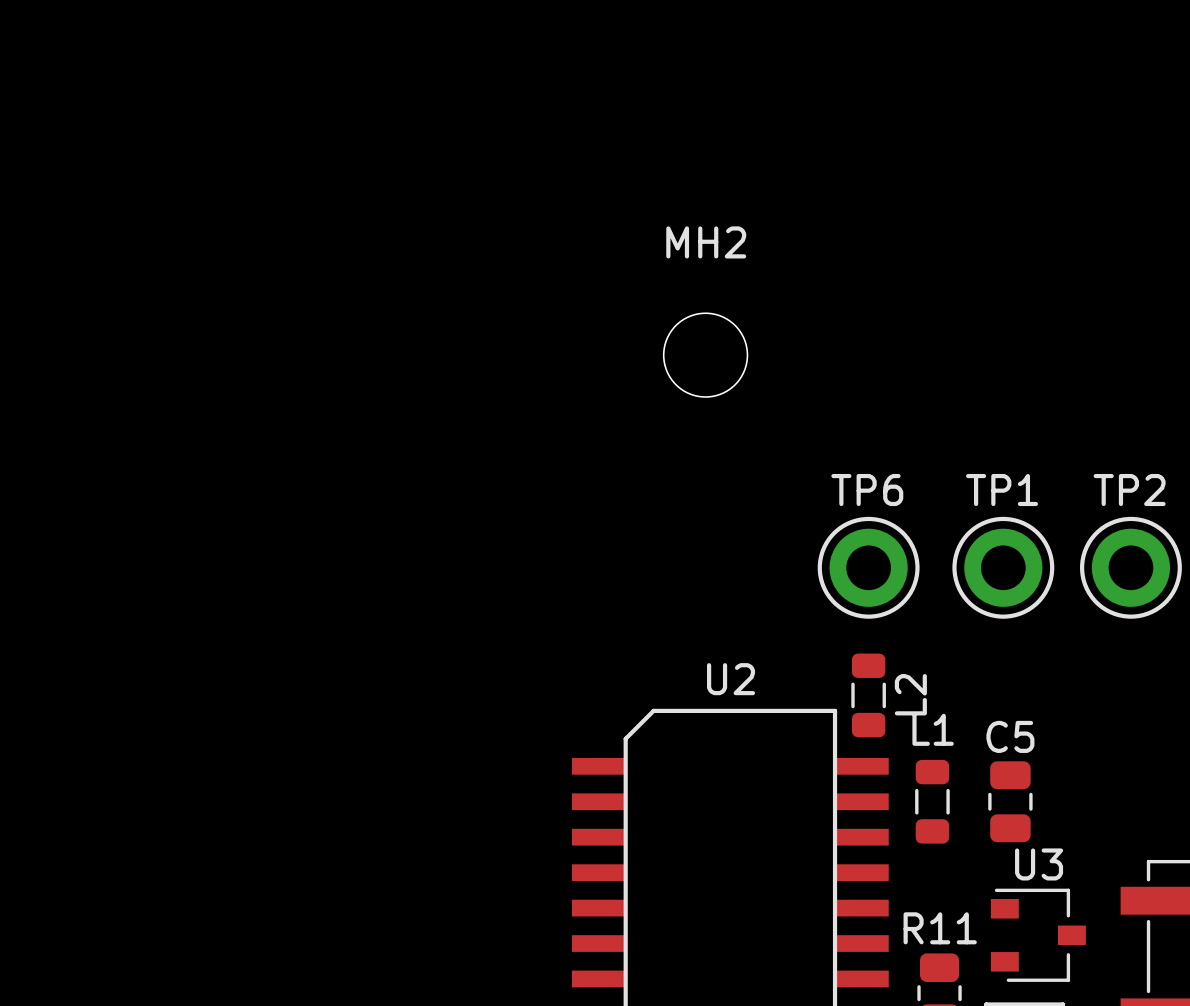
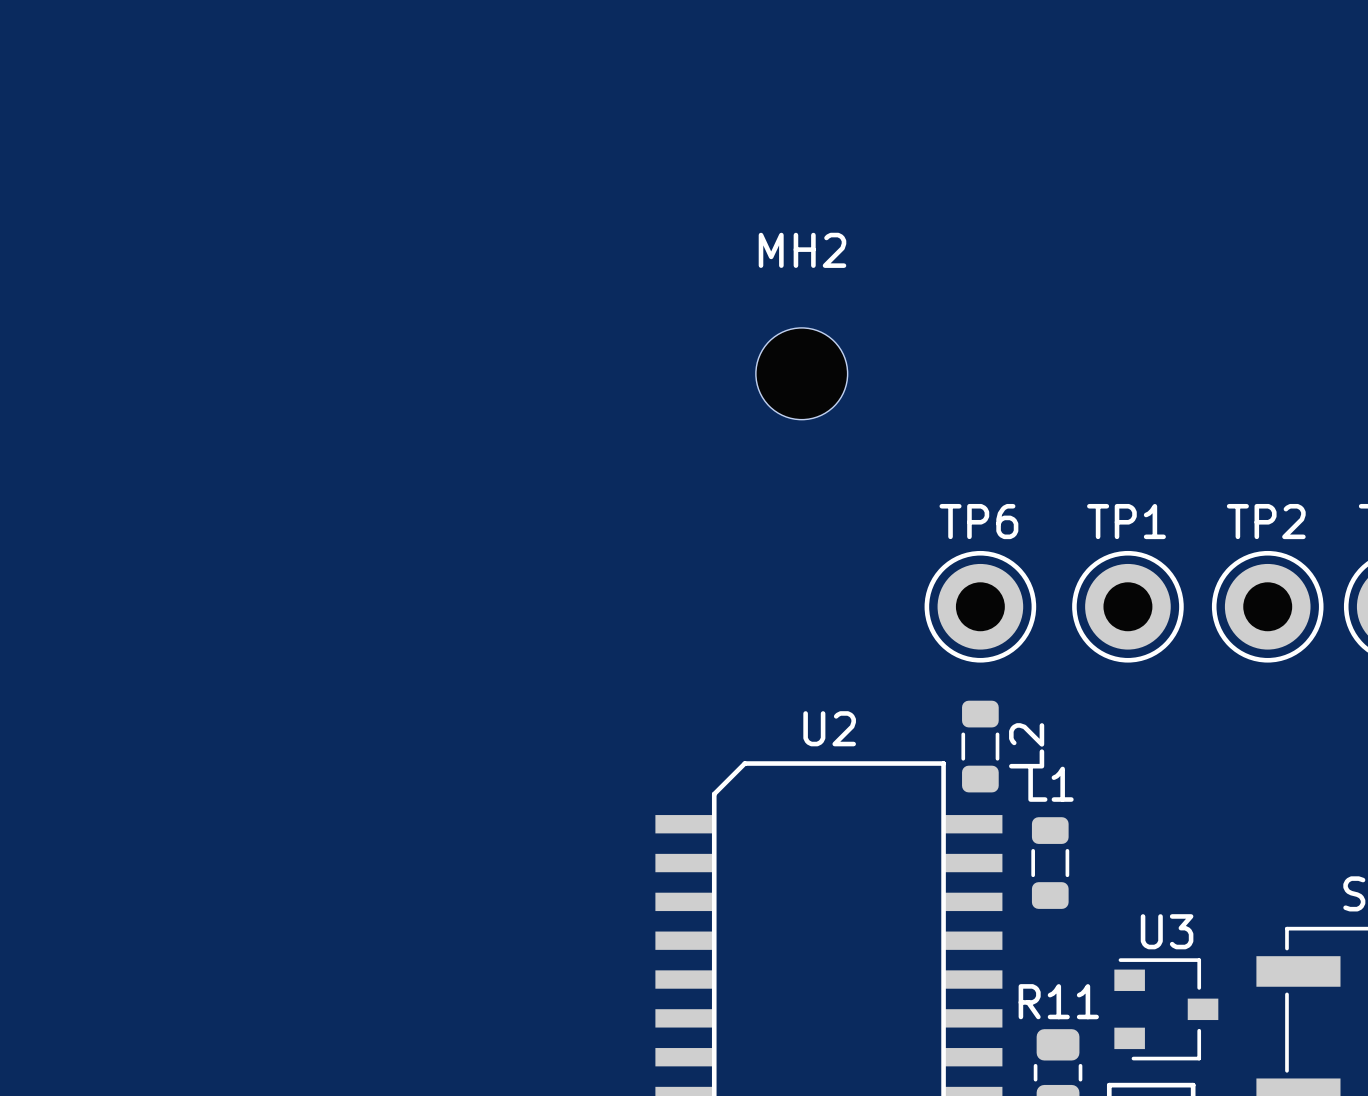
C5: (1010, 801) -> none

